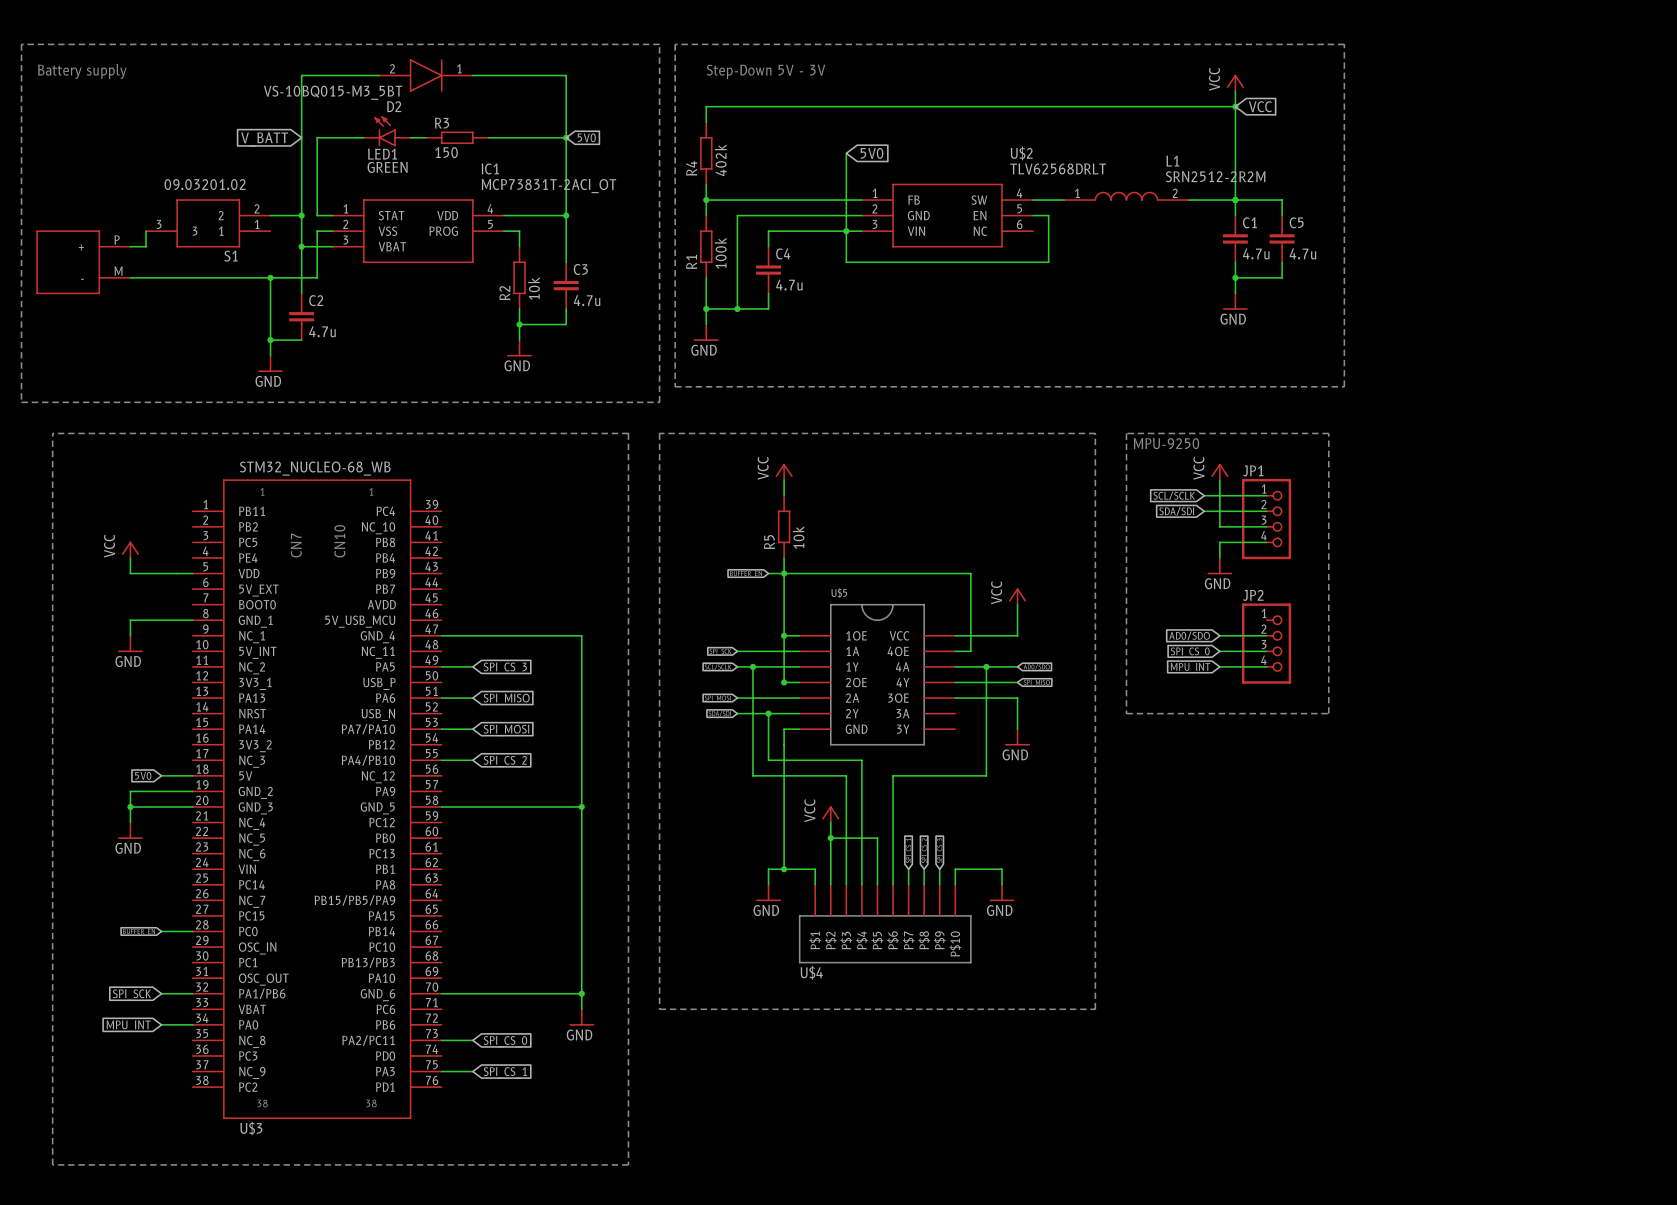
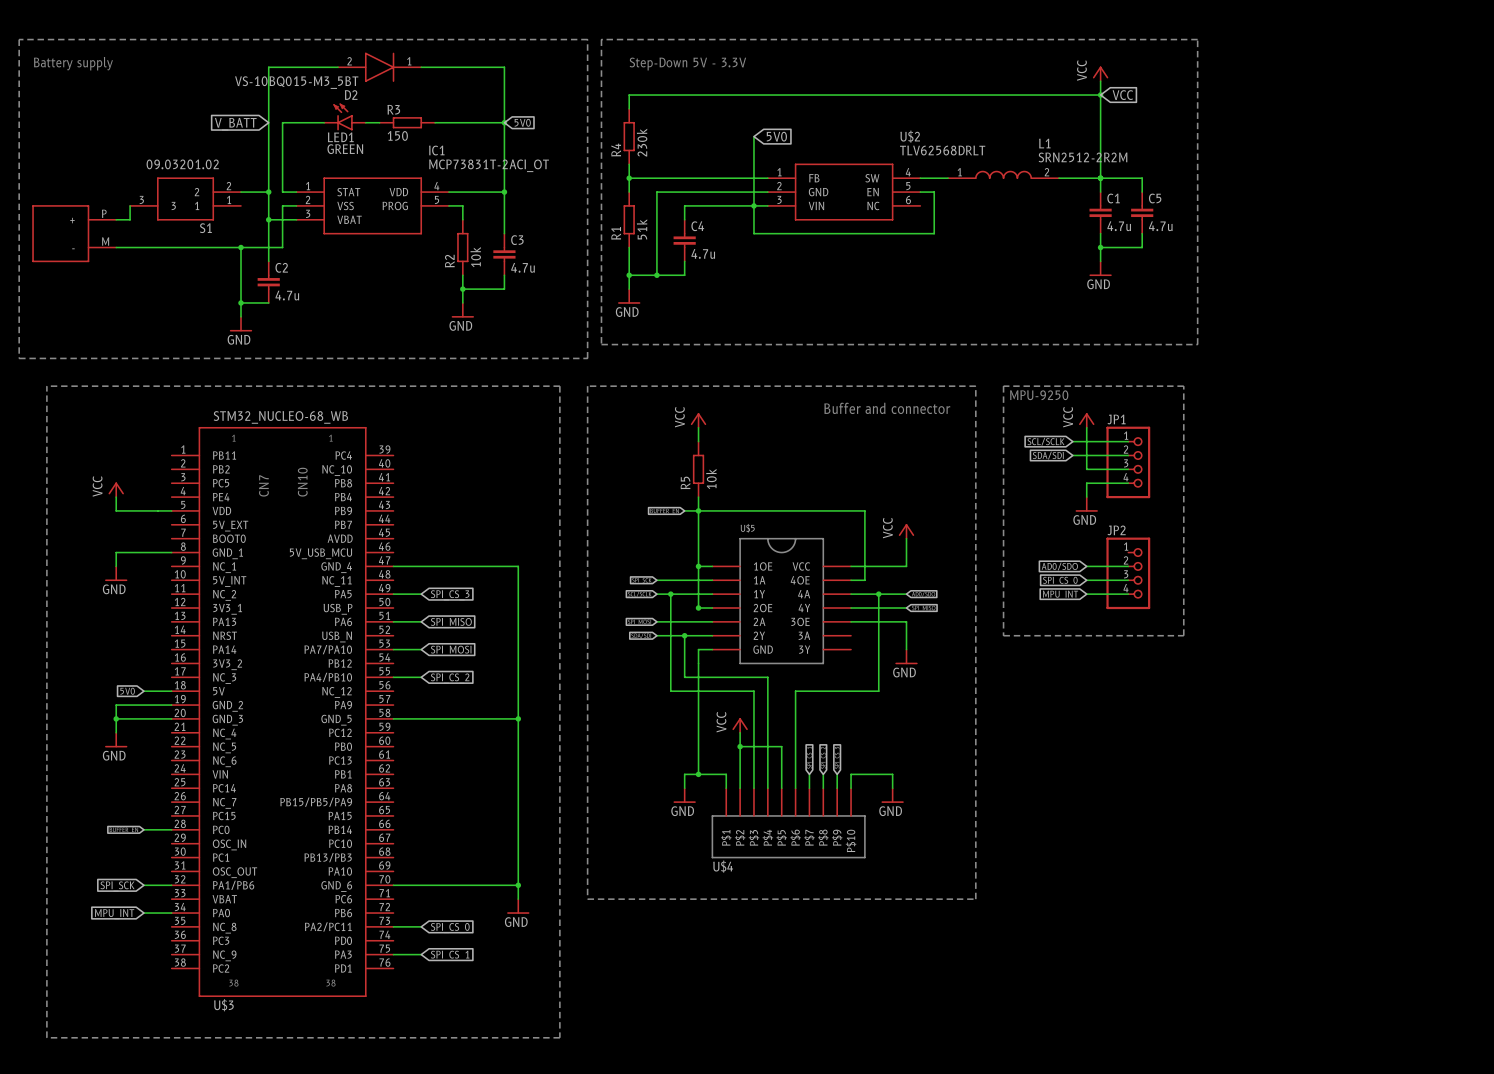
text: Step-Down 5V - 3V (766, 71) -> Step-Down 5V - 3.3V (687, 64)
R4 value: 402k (720, 160) -> 230k (642, 142)
R1 value: 100k (720, 253) -> 51k (642, 229)
text: none -> Buffer and connector (887, 408)

